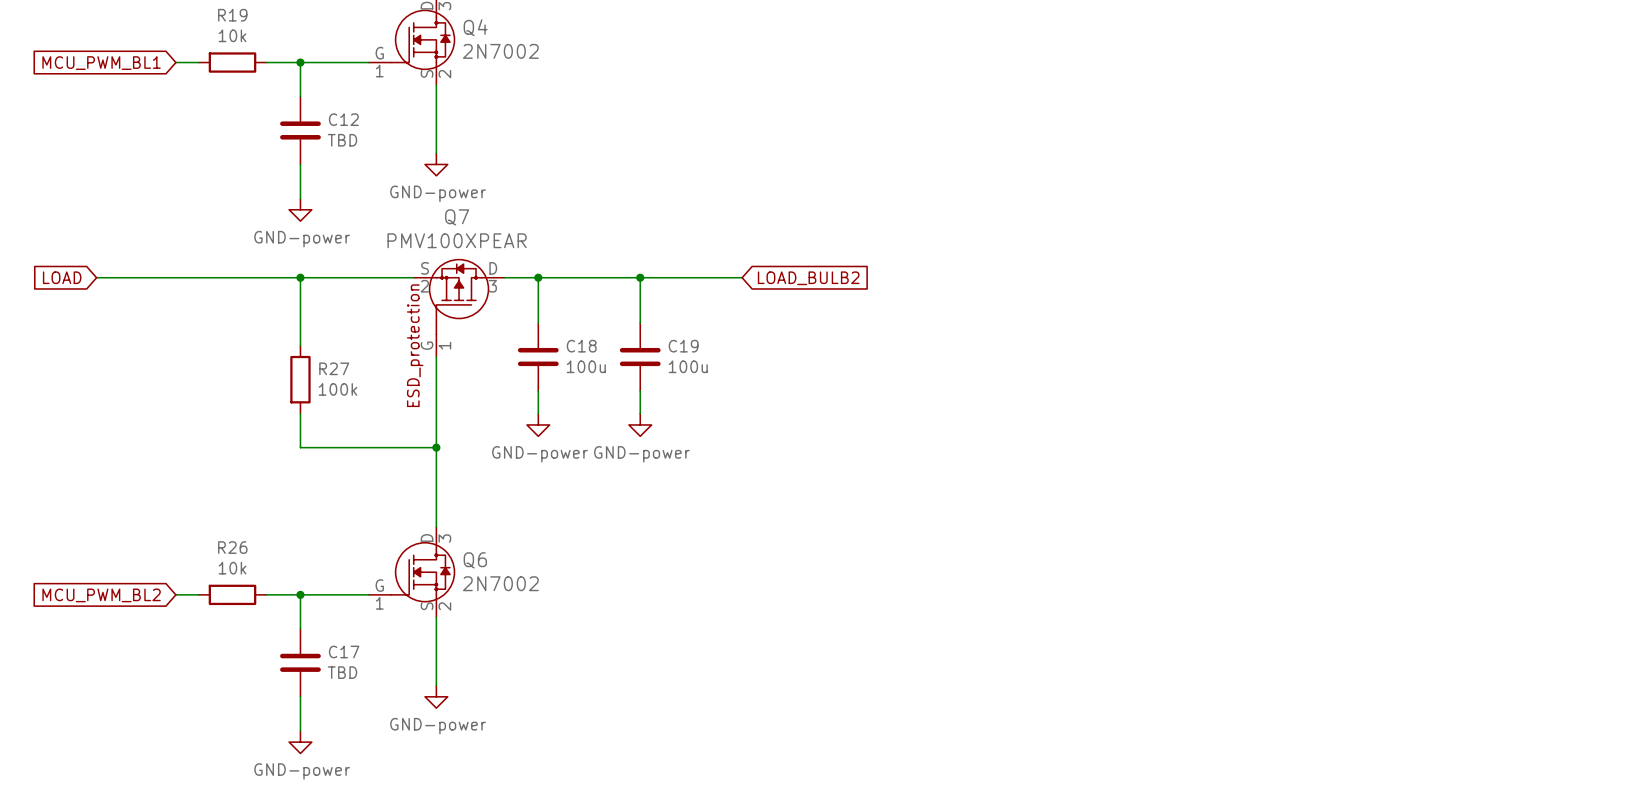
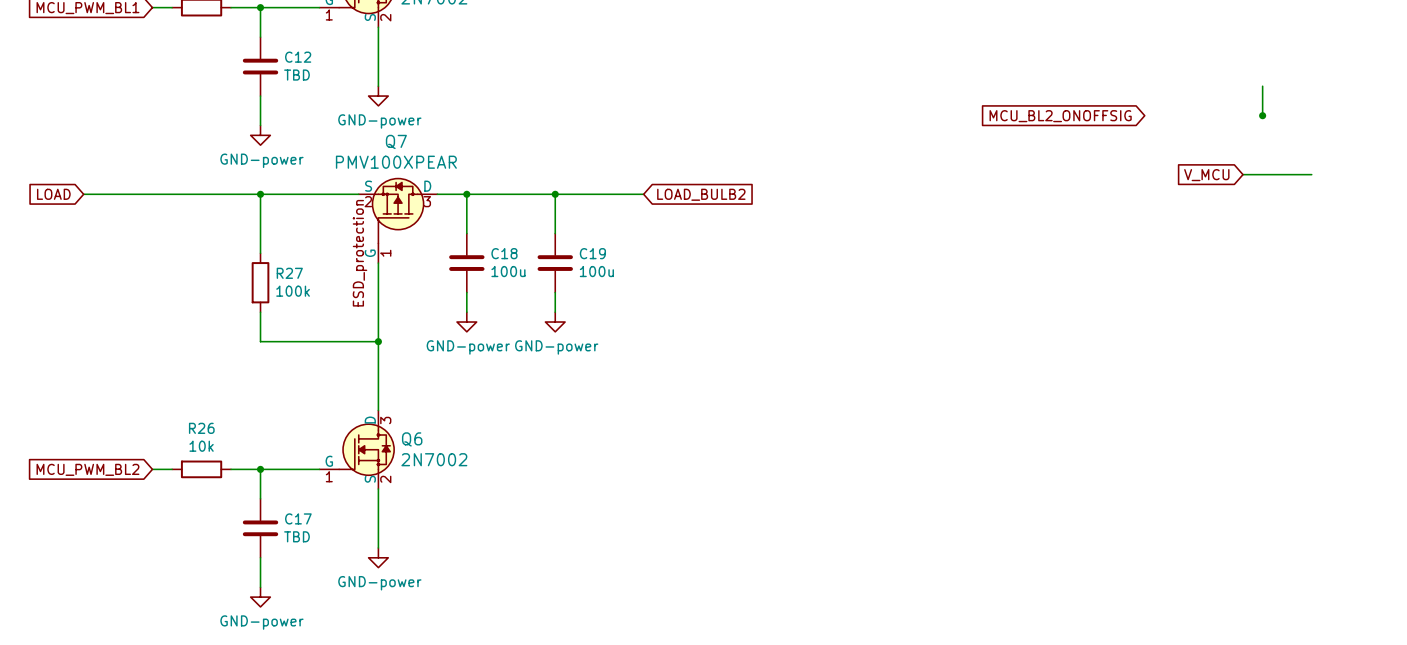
wire: none -> (1262, 86) (1262, 115)
global label: none -> MCU_BL2_ONOFFSIG (1060, 116)
junction: none -> (1262, 115)
global label: none -> V_MCU (1206, 175)
wire: none -> (1242, 174) (1311, 174)

